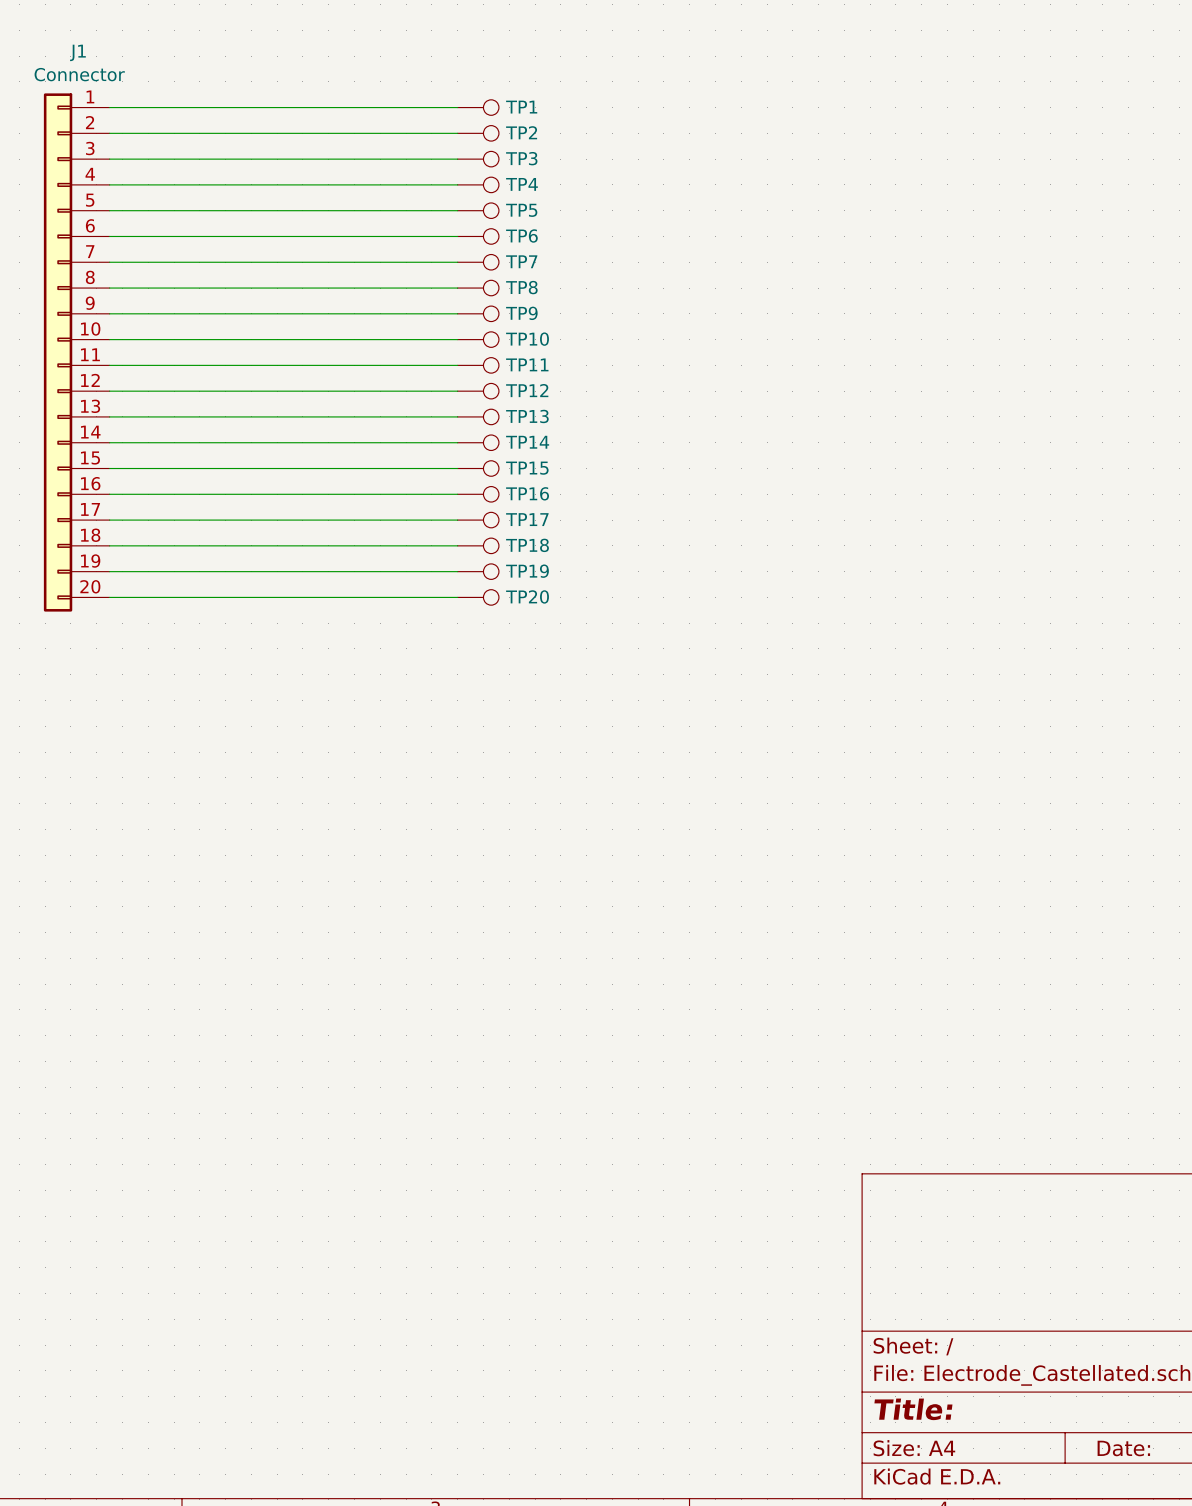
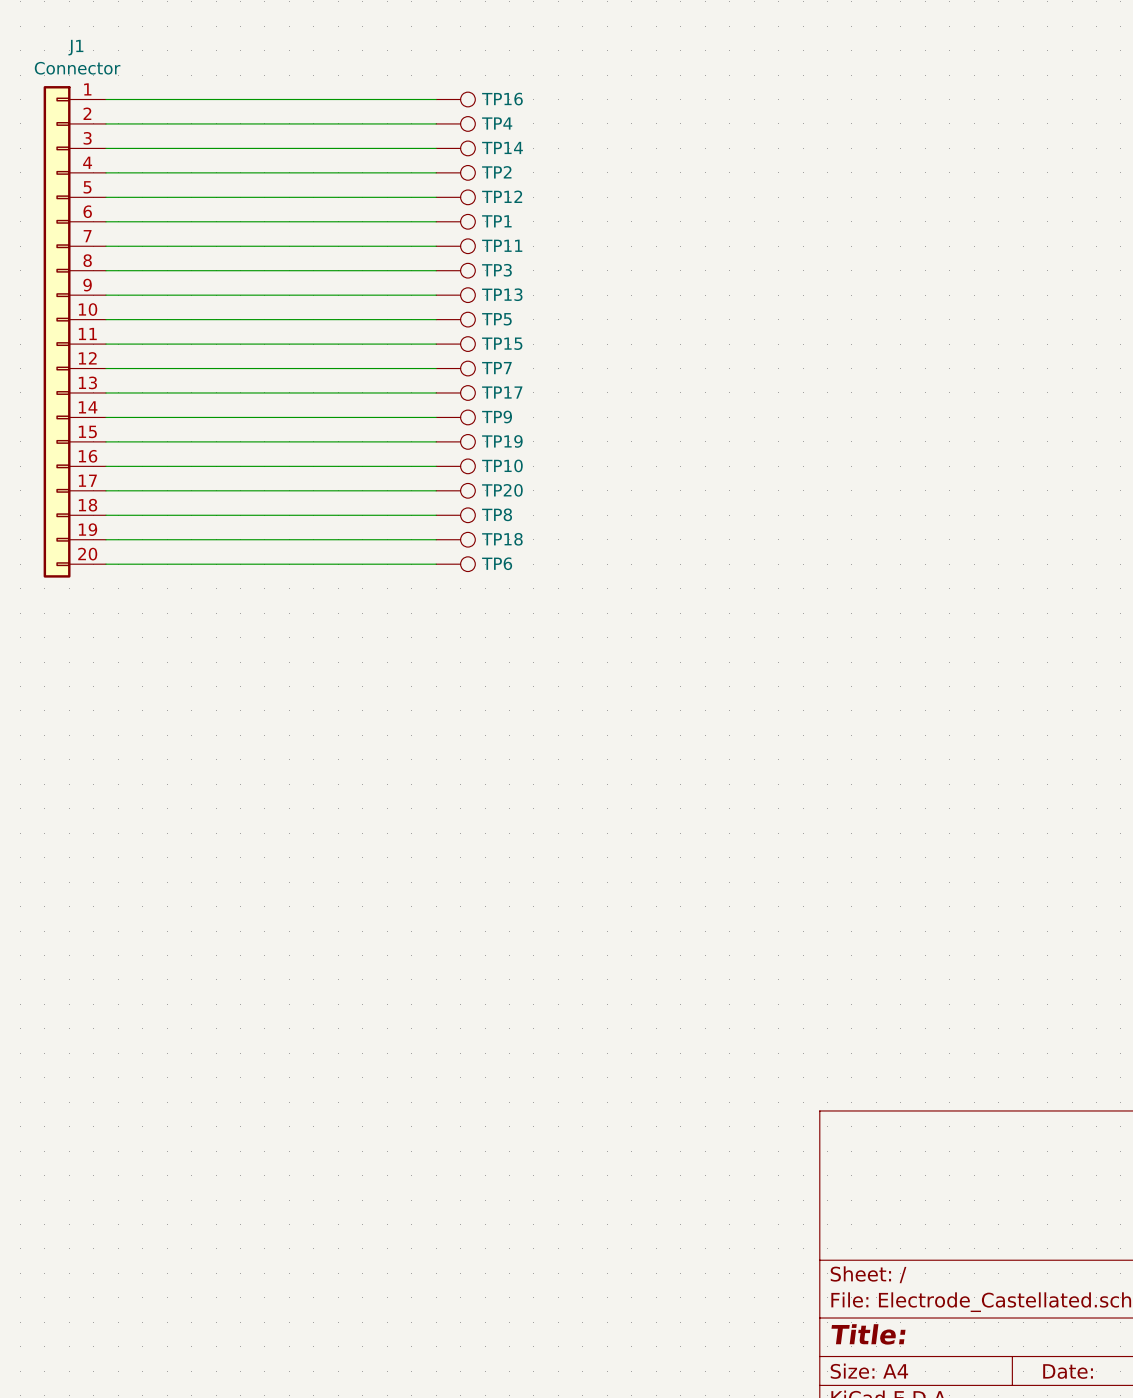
TP1 name: TP1 (521, 107) -> TP16 (502, 99)
TP2 name: TP2 (521, 132) -> TP4 (497, 123)
TP3 name: TP3 (521, 158) -> TP14 (502, 147)
TP4 name: TP4 (521, 184) -> TP2 (496, 172)
TP5 name: TP5 (521, 210) -> TP12 (502, 196)
TP6 name: TP6 (521, 236) -> TP1 (496, 221)
TP7 name: TP7 (521, 261) -> TP11 (502, 245)
TP8 name: TP8 (521, 287) -> TP3 (496, 270)
TP9 name: TP9 (521, 313) -> TP13 (502, 294)
TP10 name: TP10 (527, 339) -> TP5 (496, 319)
TP11 name: TP11 (527, 364) -> TP15 (502, 343)
TP12 name: TP12 (527, 390) -> TP7 (496, 368)
TP13 name: TP13 (527, 416) -> TP17 (502, 392)
TP14 name: TP14 (527, 442) -> TP9 (497, 417)
TP15 name: TP15 (527, 468) -> TP19 (502, 441)
TP16 name: TP16 (527, 493) -> TP10 (502, 465)
TP17 name: TP17 (527, 519) -> TP20 (502, 490)
TP18 name: TP18 (527, 545) -> TP8 (497, 514)
TP19 name: TP19 (527, 571) -> TP18 (502, 539)
TP20 name: TP20 (527, 596) -> TP6 (497, 563)

